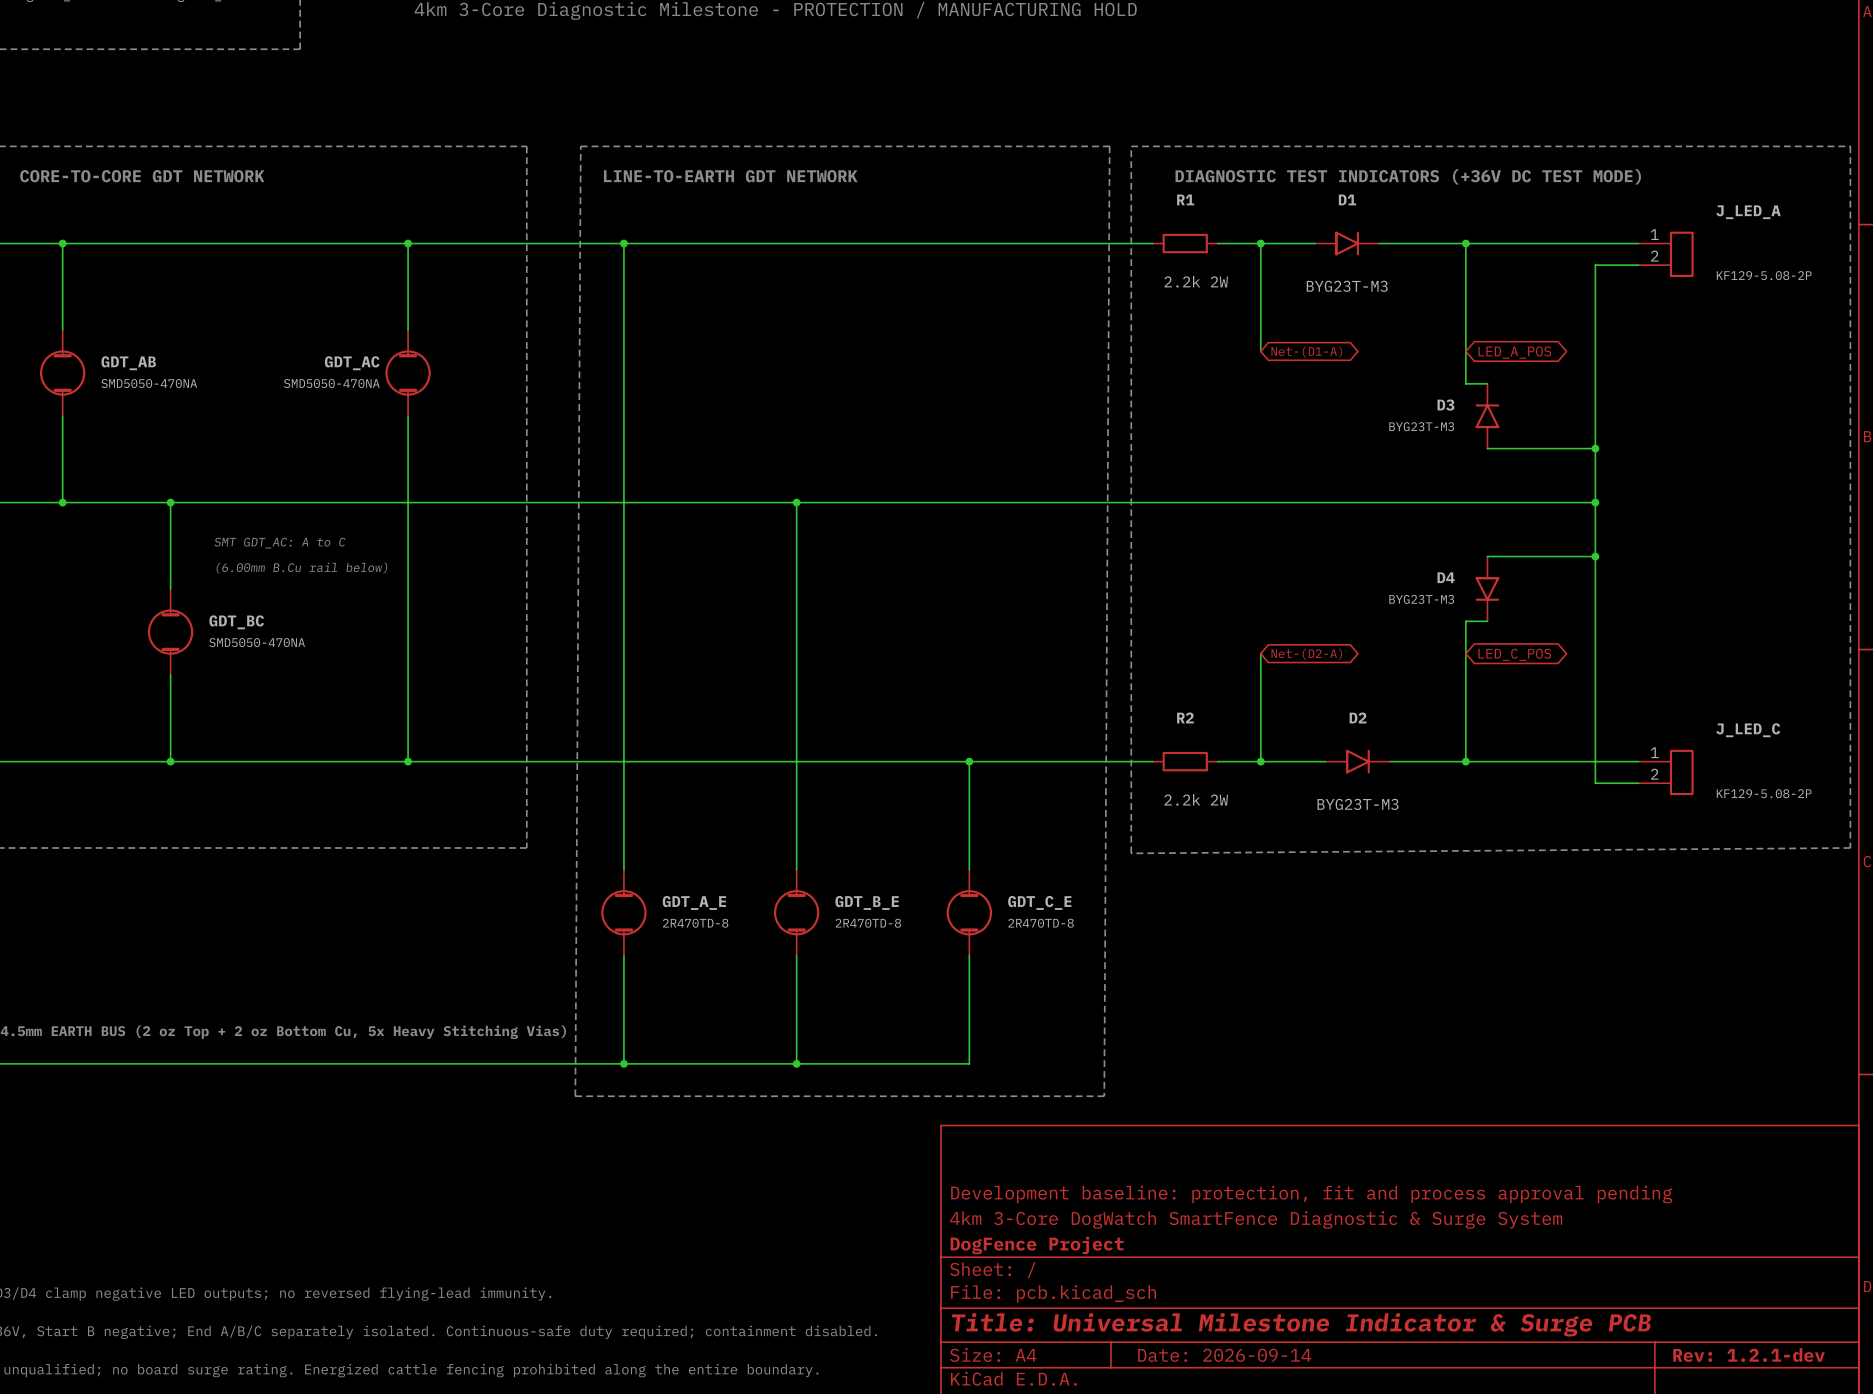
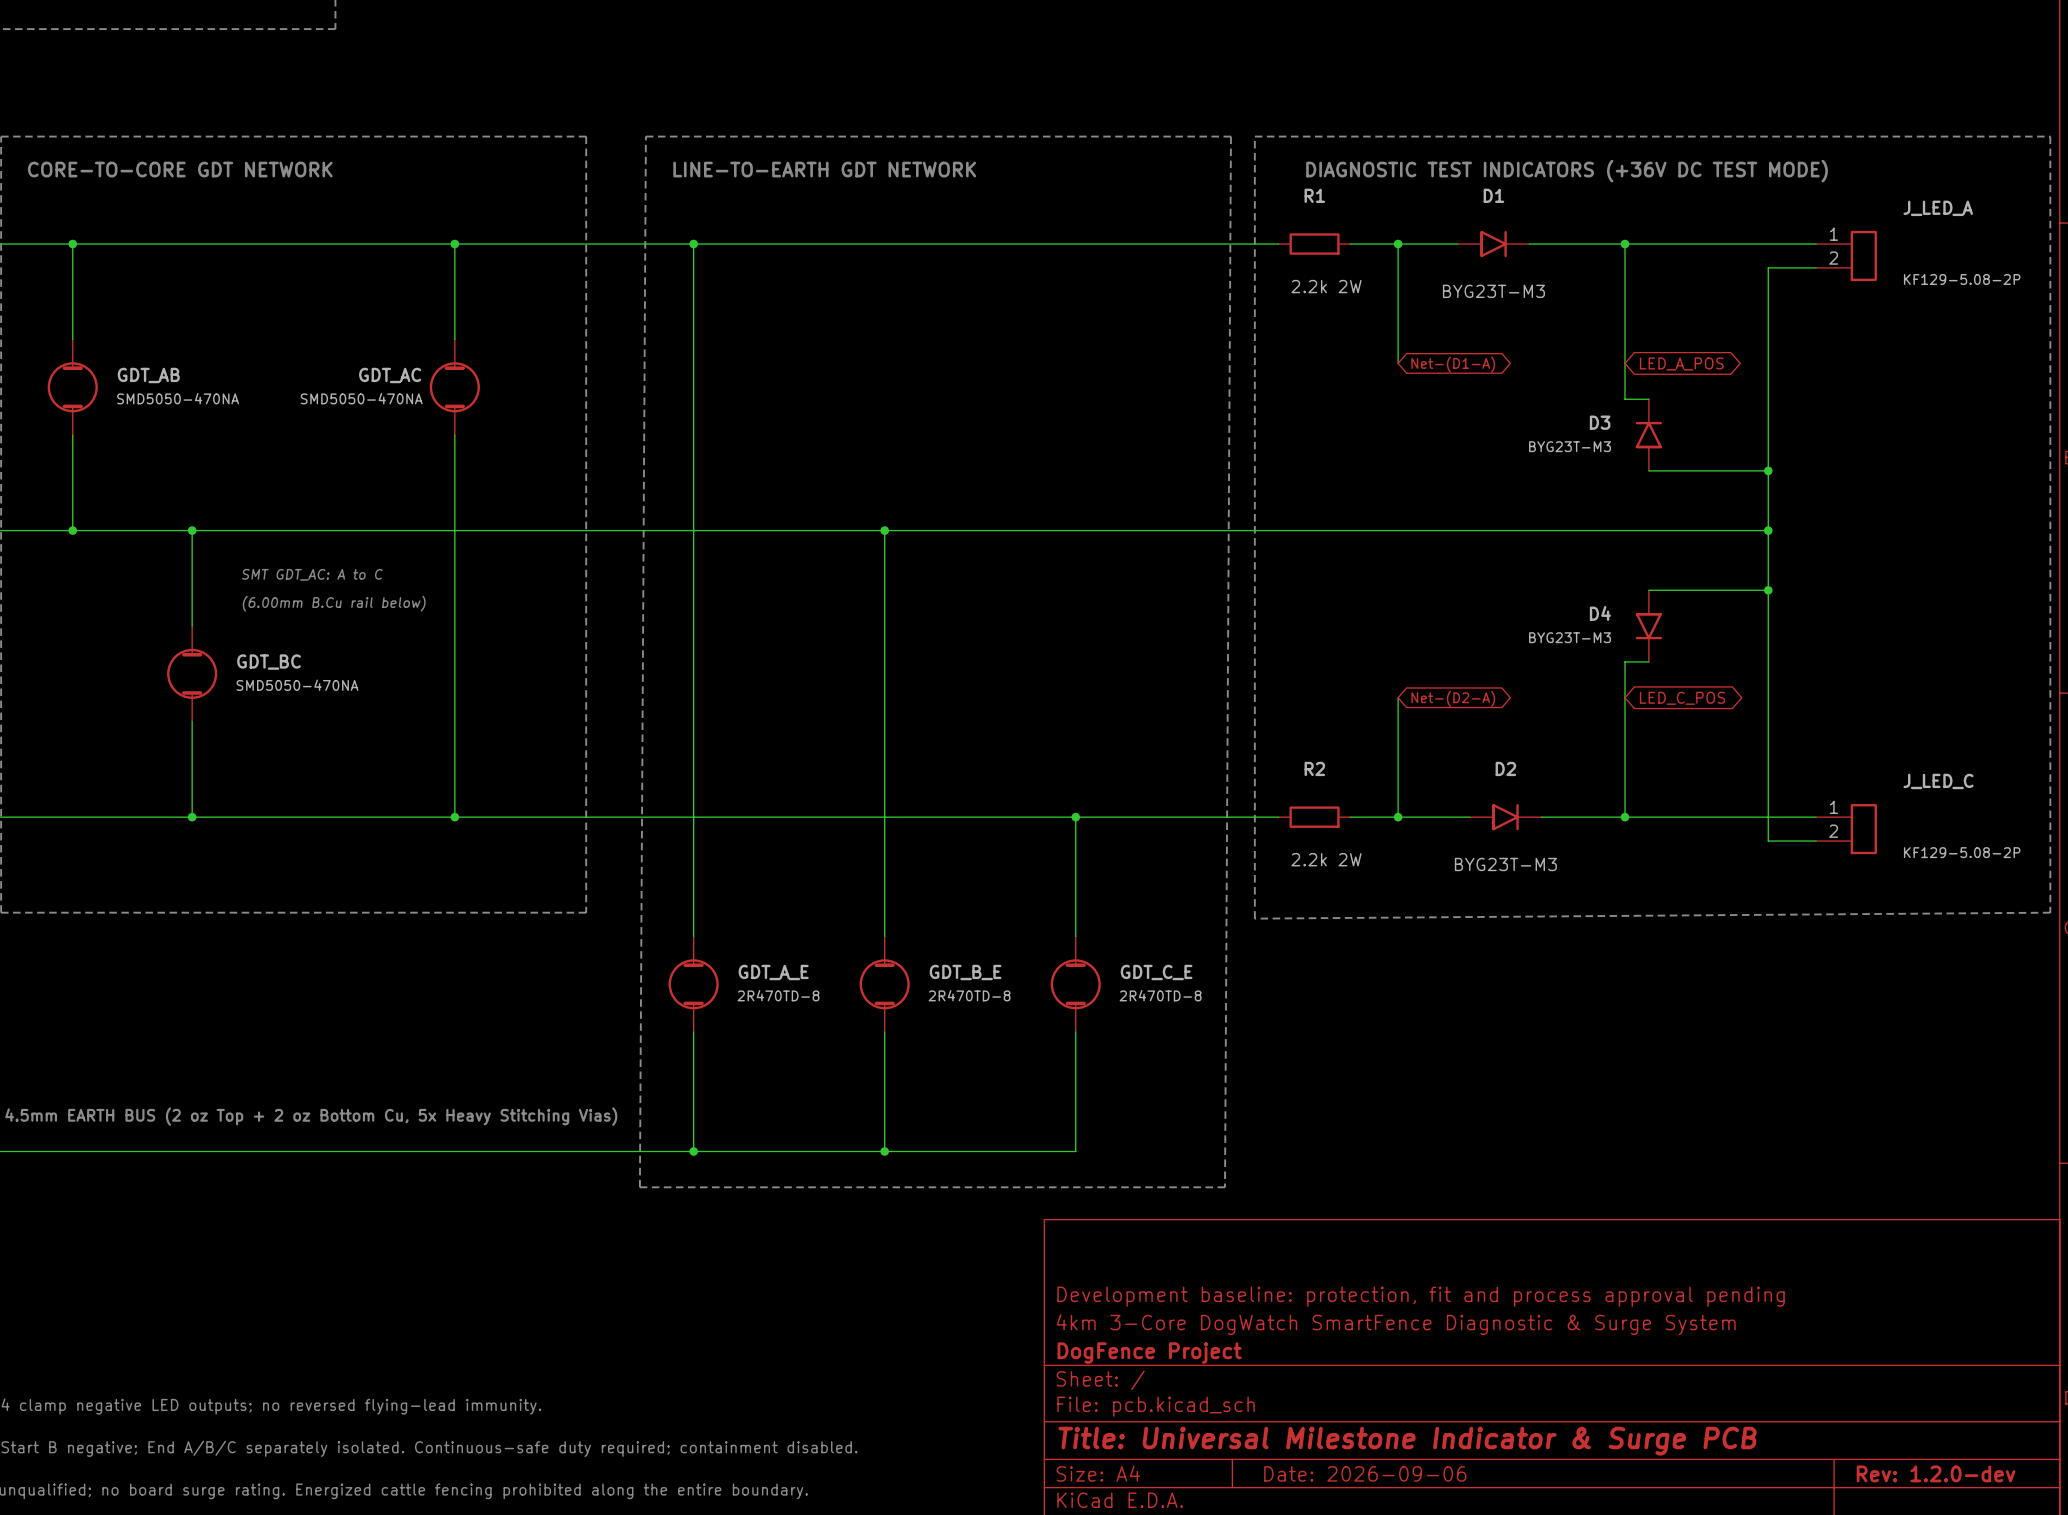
title block: Date: 2026-09-14 (1224, 1355) -> Date: 2026-09-06 (1365, 1473)
title block: Rev: 1.2.1-dev (1749, 1355) -> Rev: 1.2.0-dev (1936, 1473)

